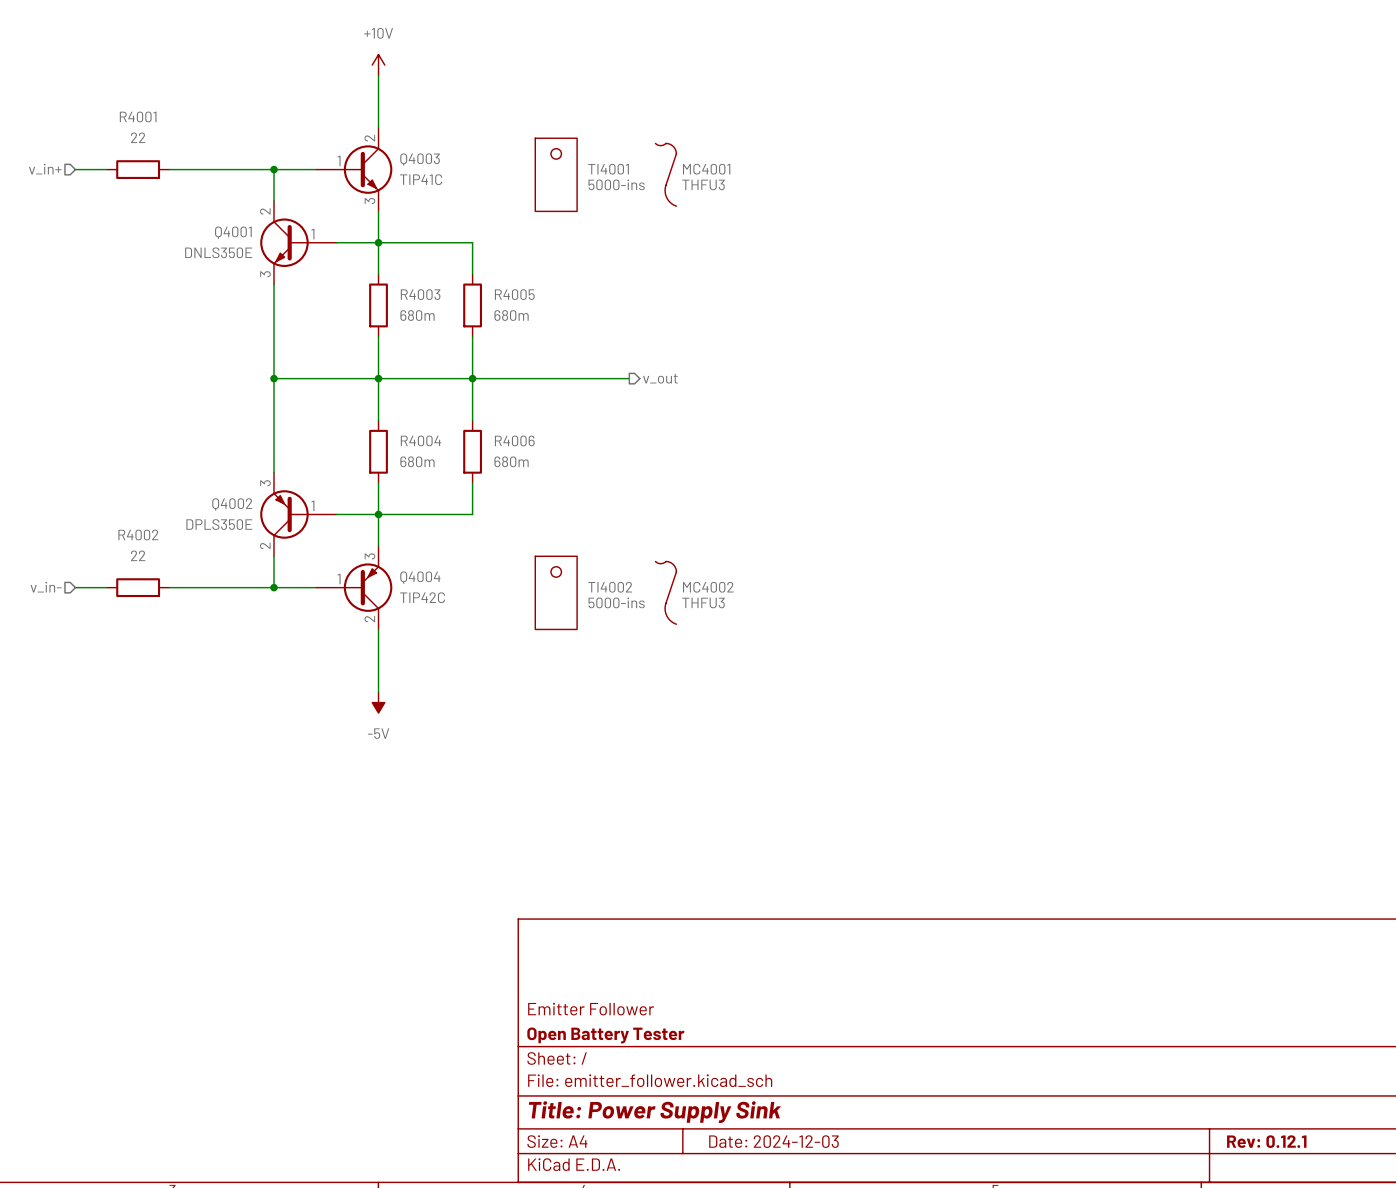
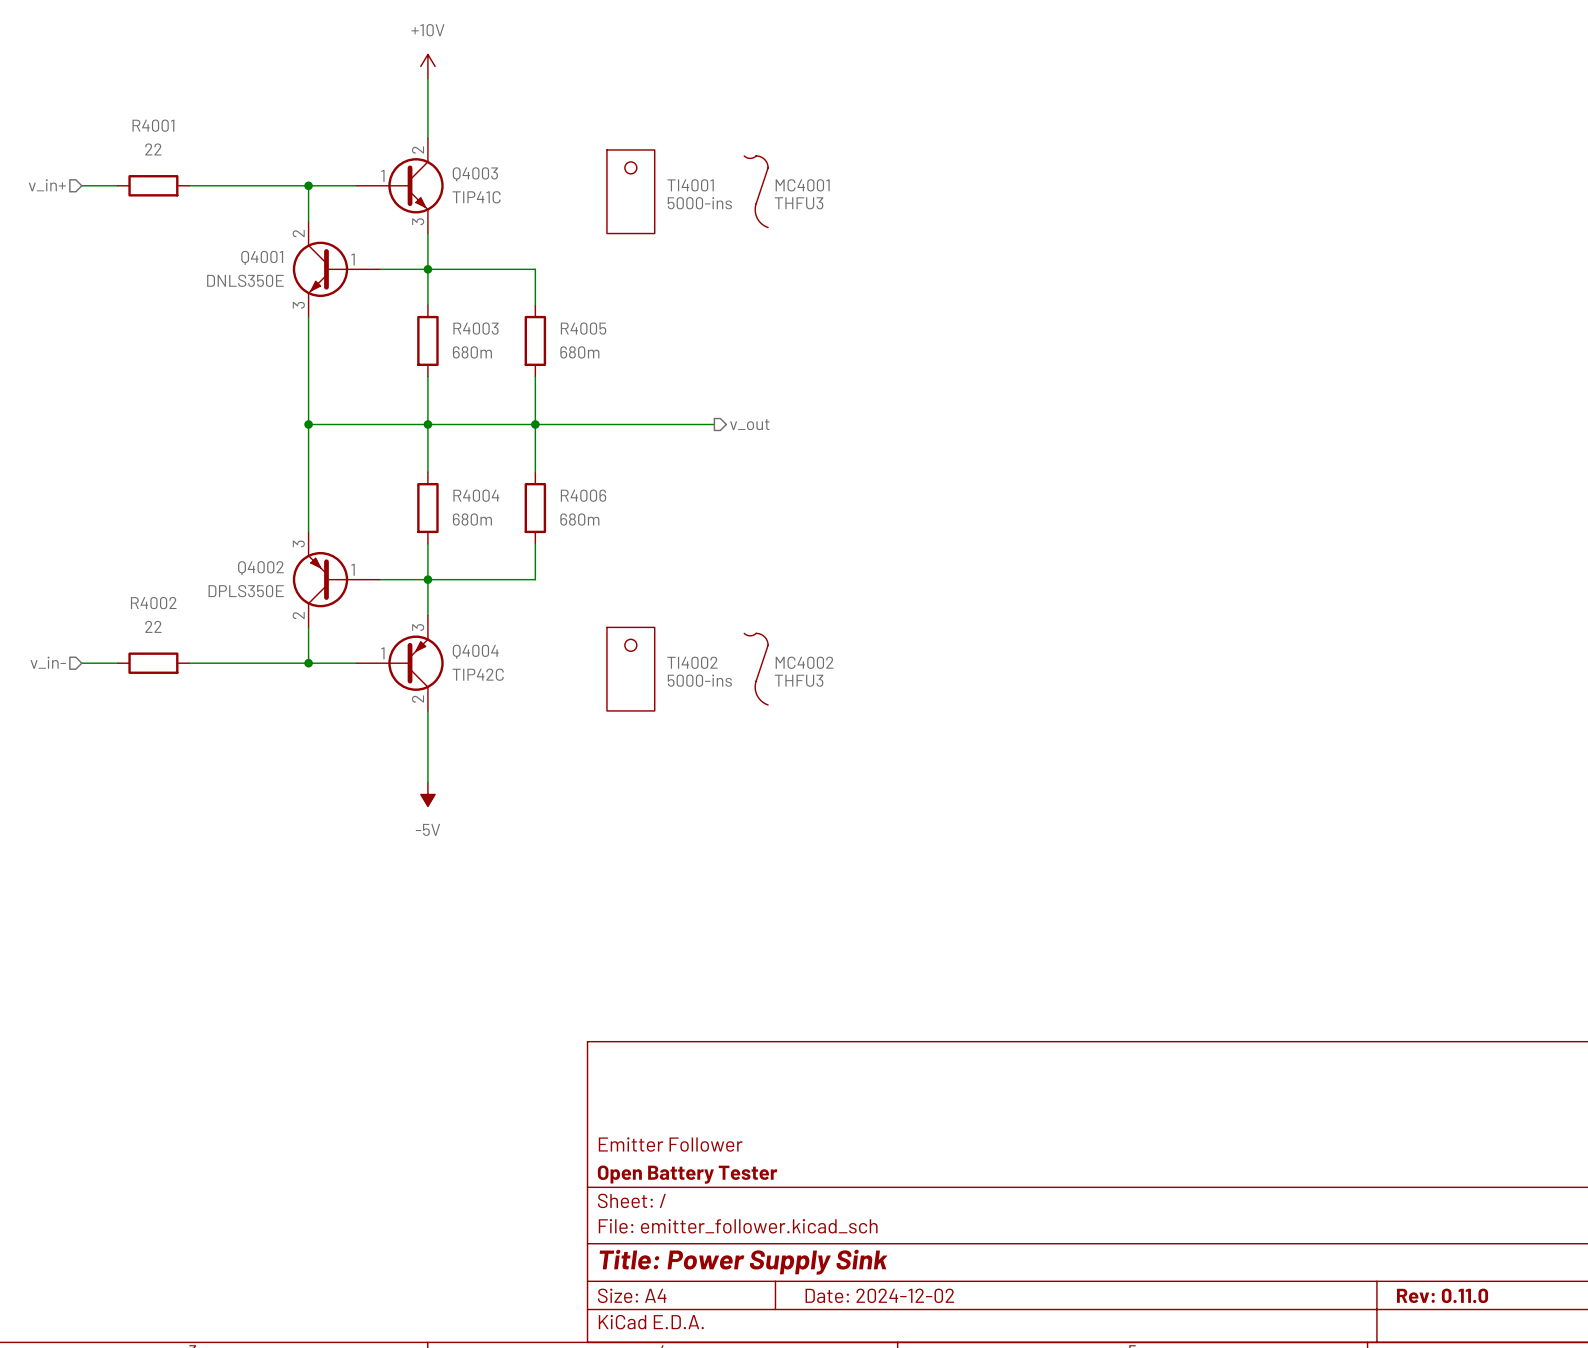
title block: Date: 2024-12-03 (773, 1141) -> Date: 2024-12-02 (879, 1295)
title block: Rev: 0.12.1 (1266, 1141) -> Rev: 0.11.0 (1442, 1295)

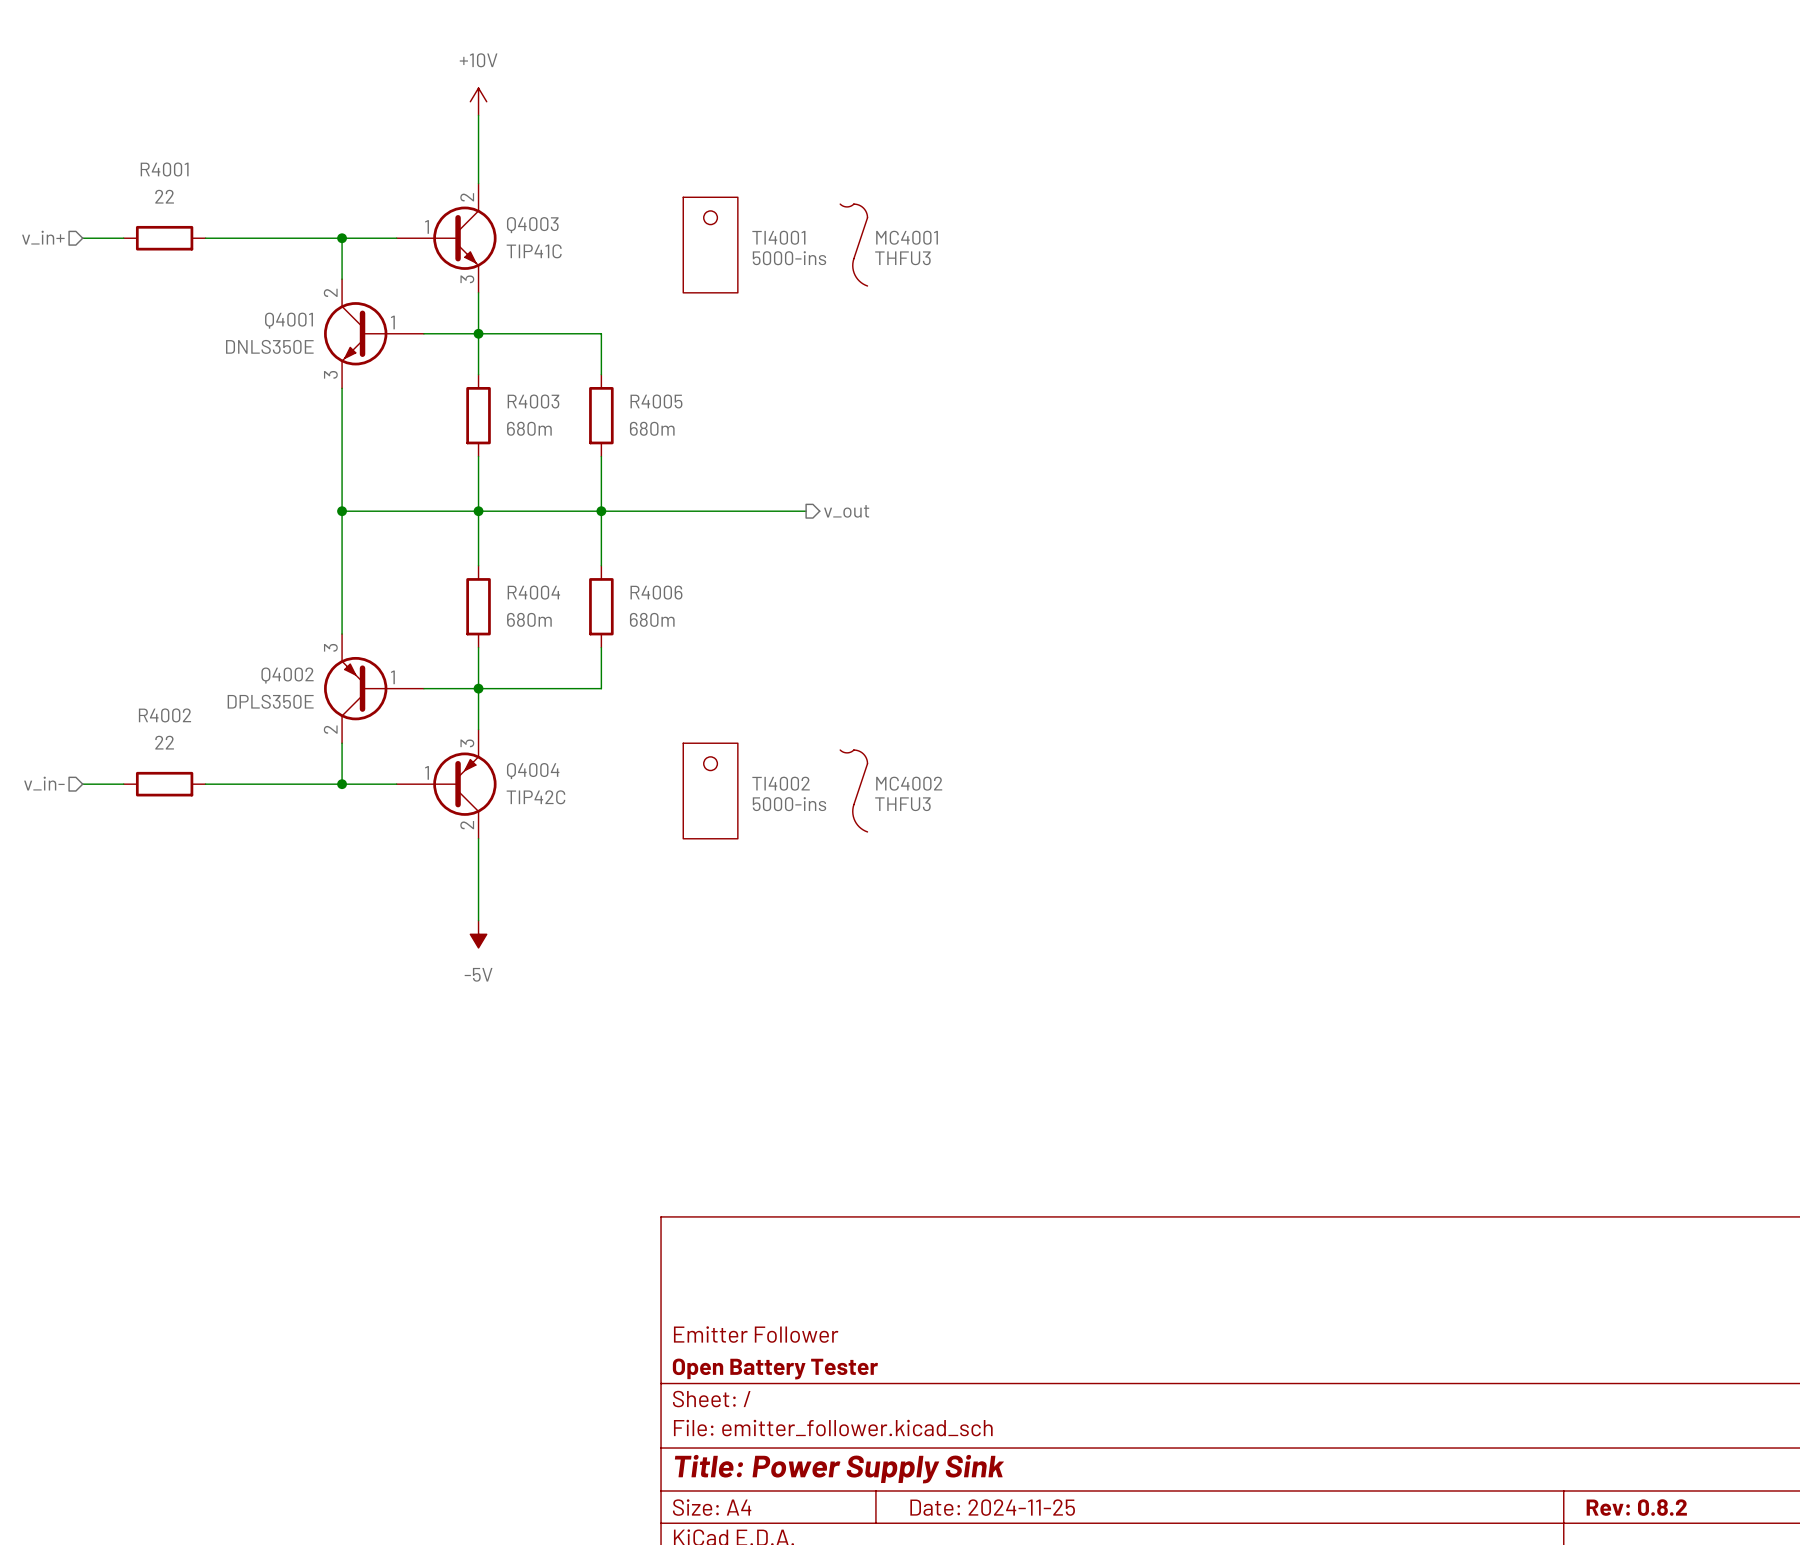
title block: Date: 2024-12-02 (879, 1295) -> Date: 2024-11-25 (992, 1507)
title block: Rev: 0.11.0 (1442, 1295) -> Rev: 0.8.2 (1636, 1507)

